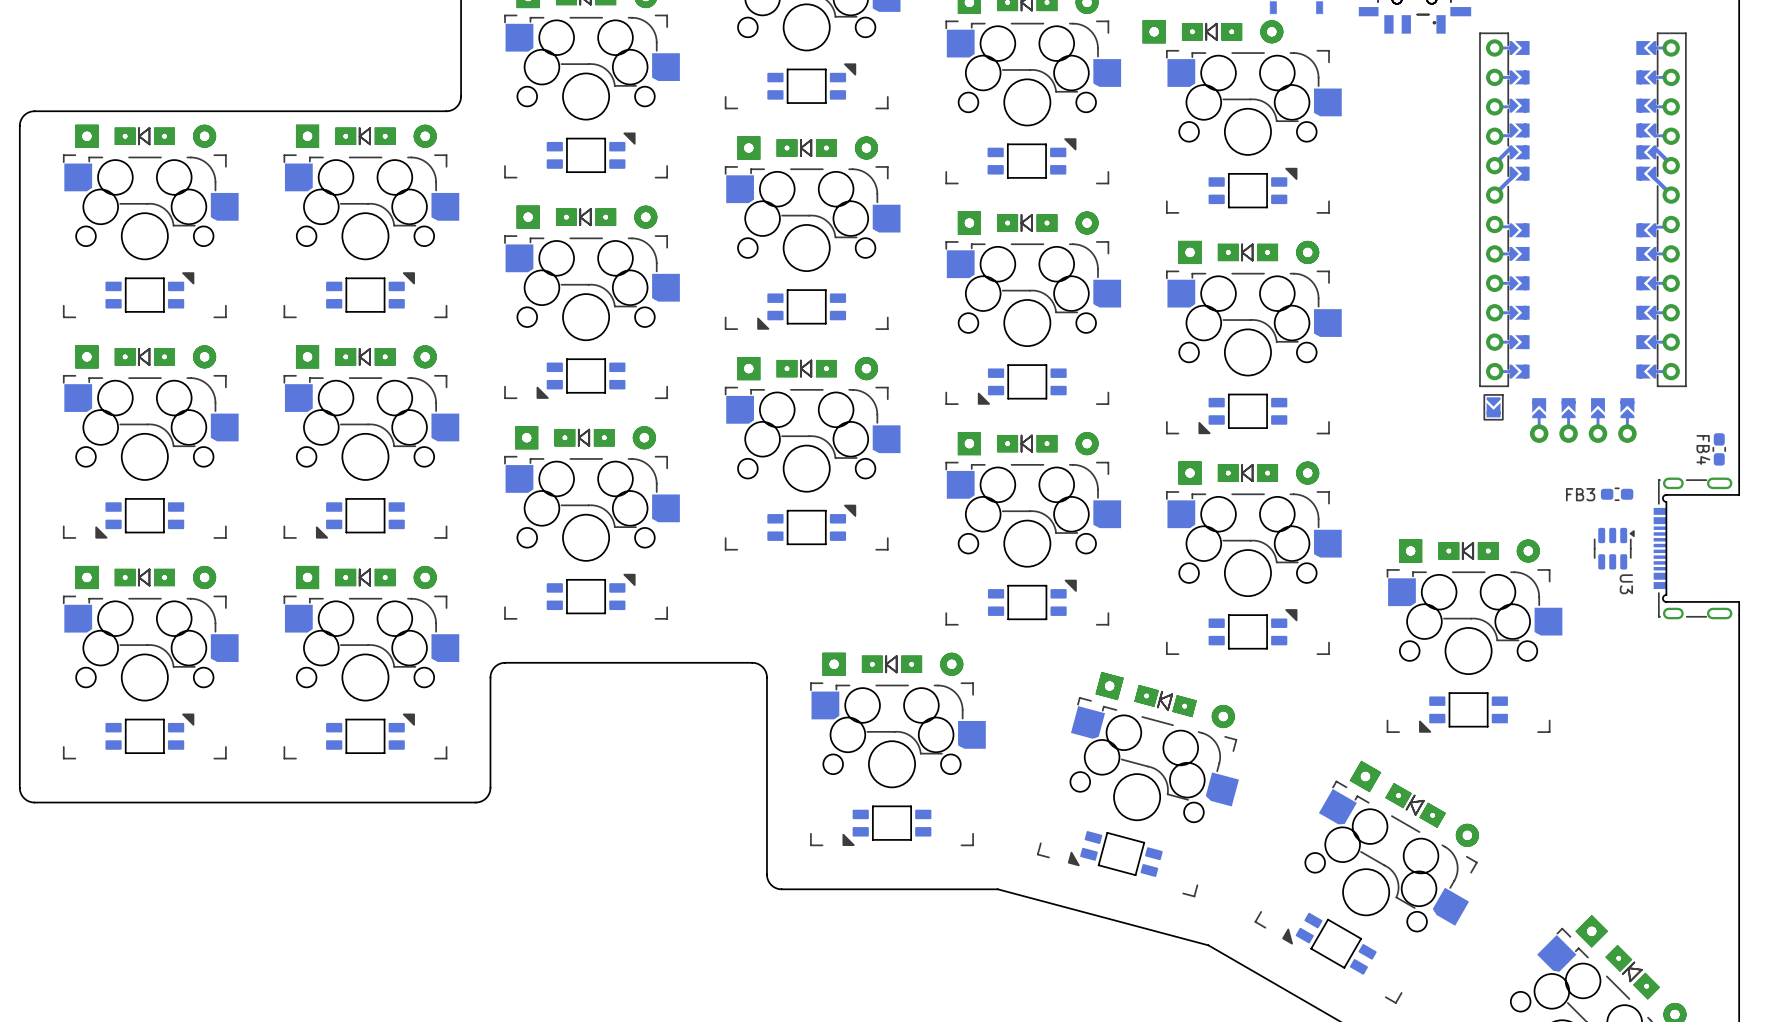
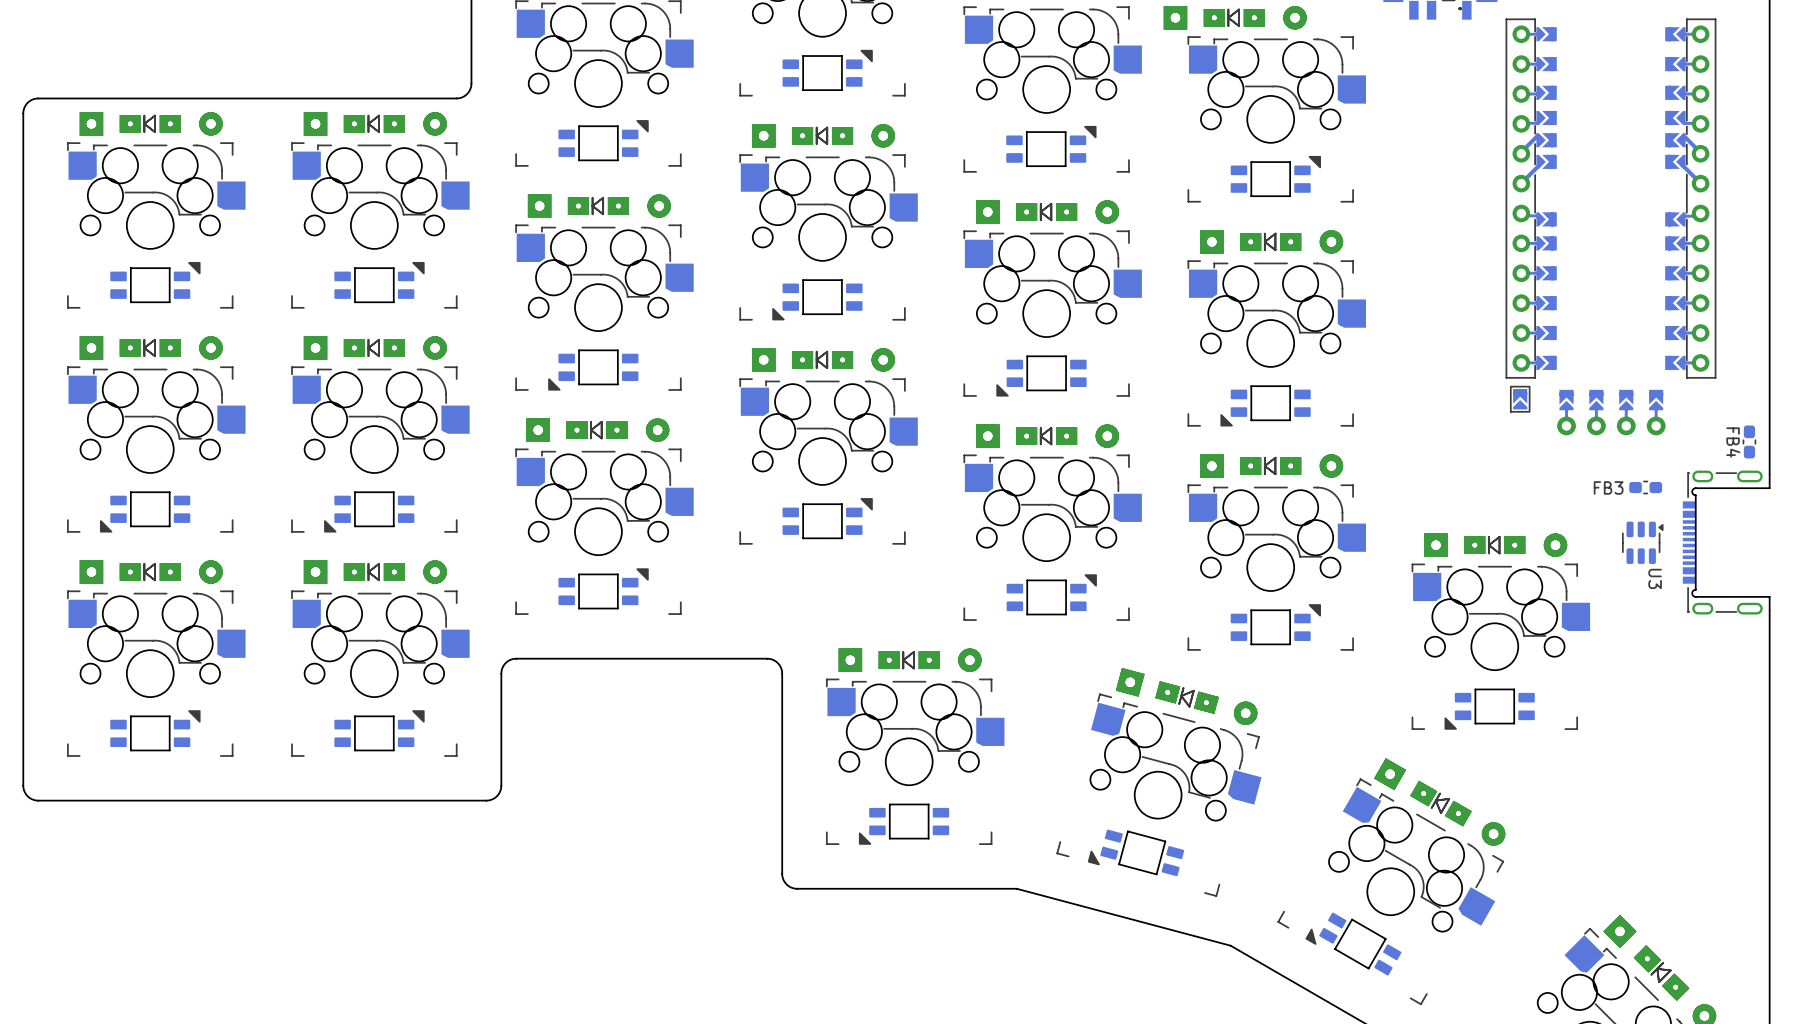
part rotation: 0° (1493, 407) -> 180° (1520, 399)

